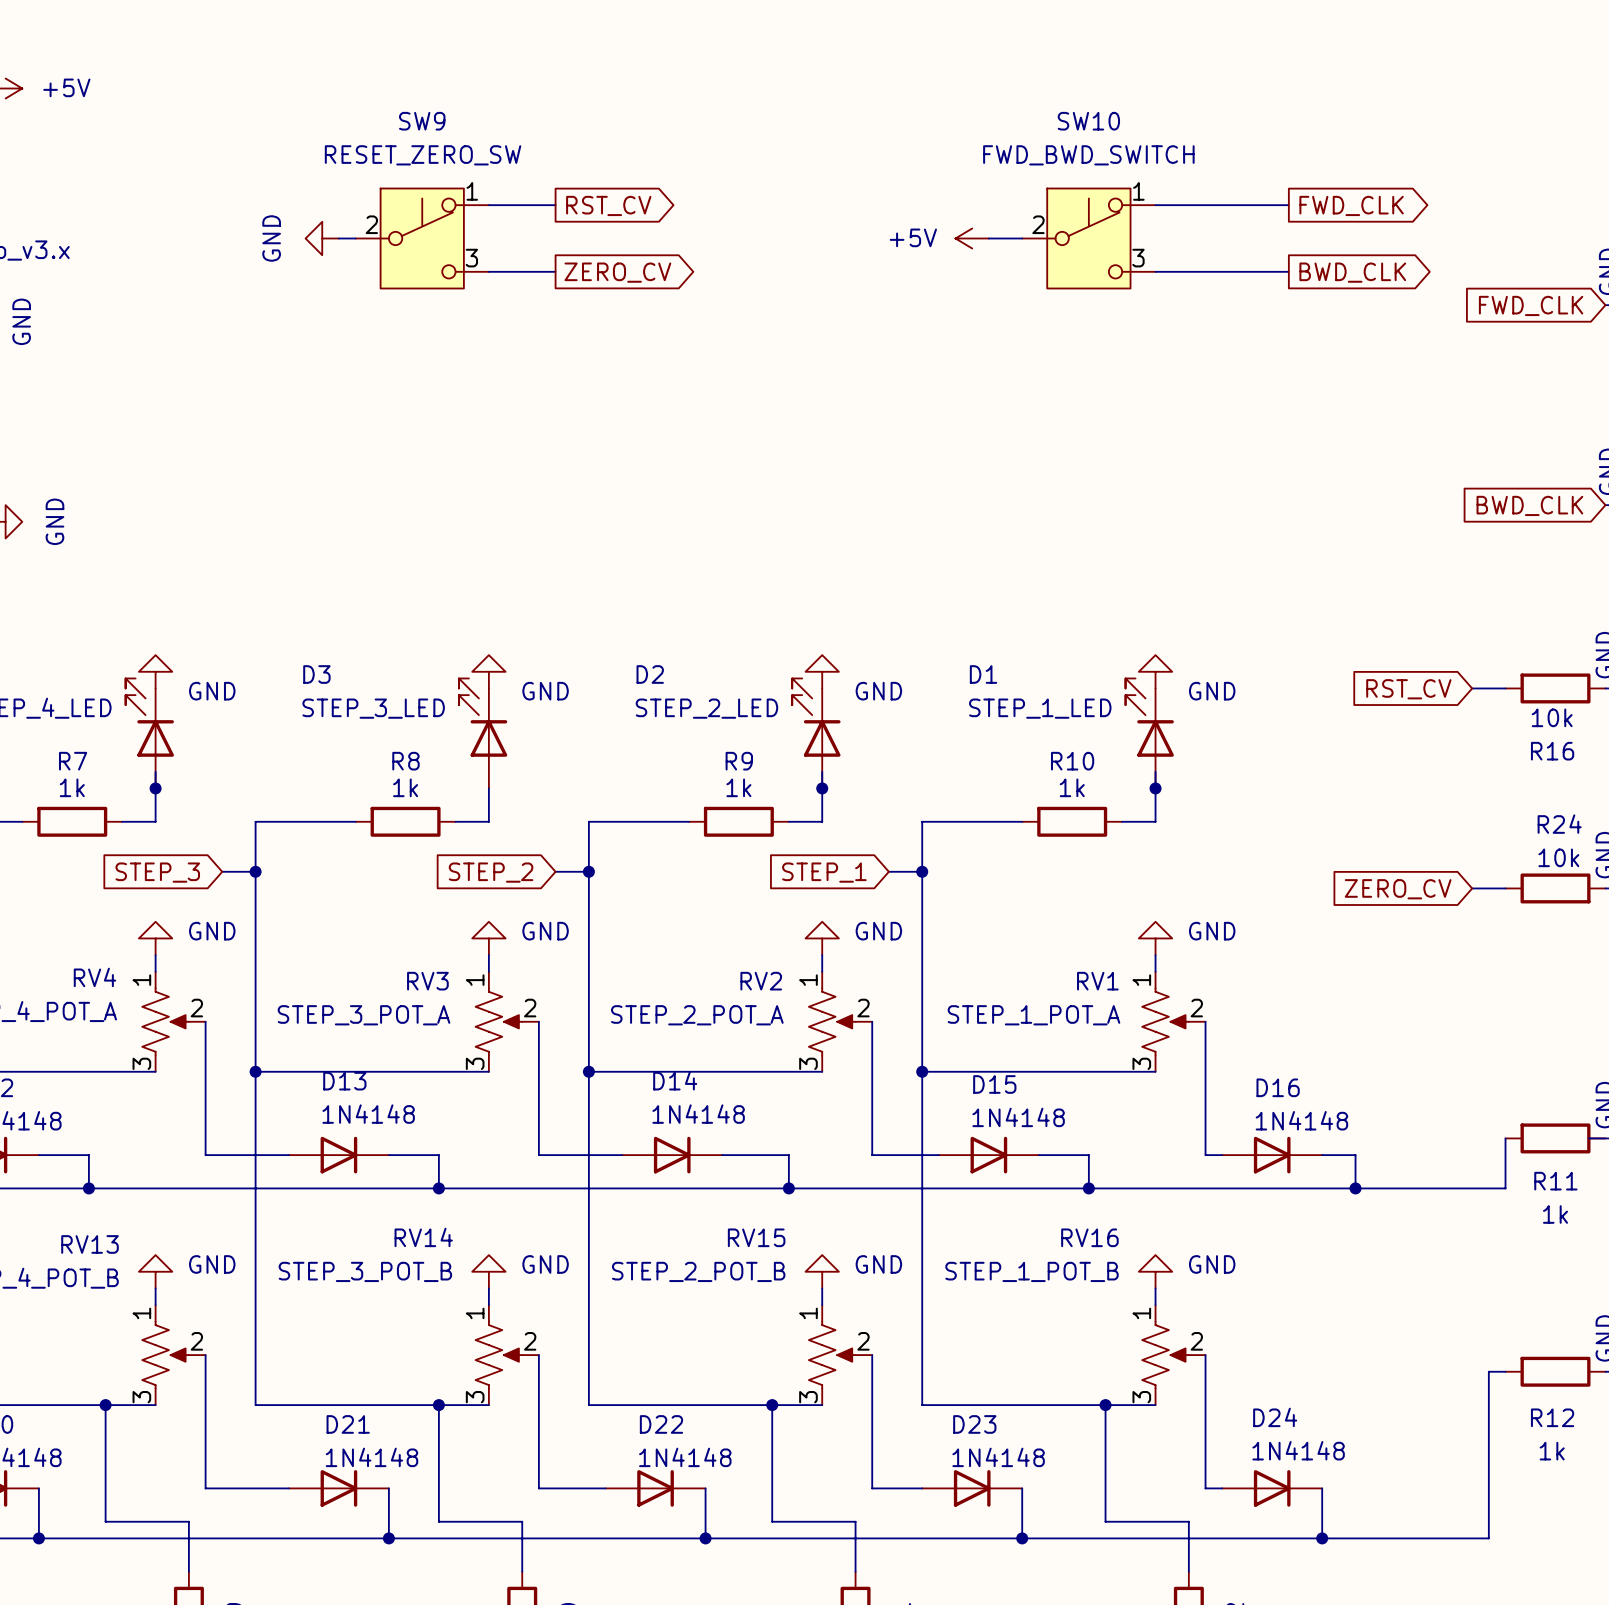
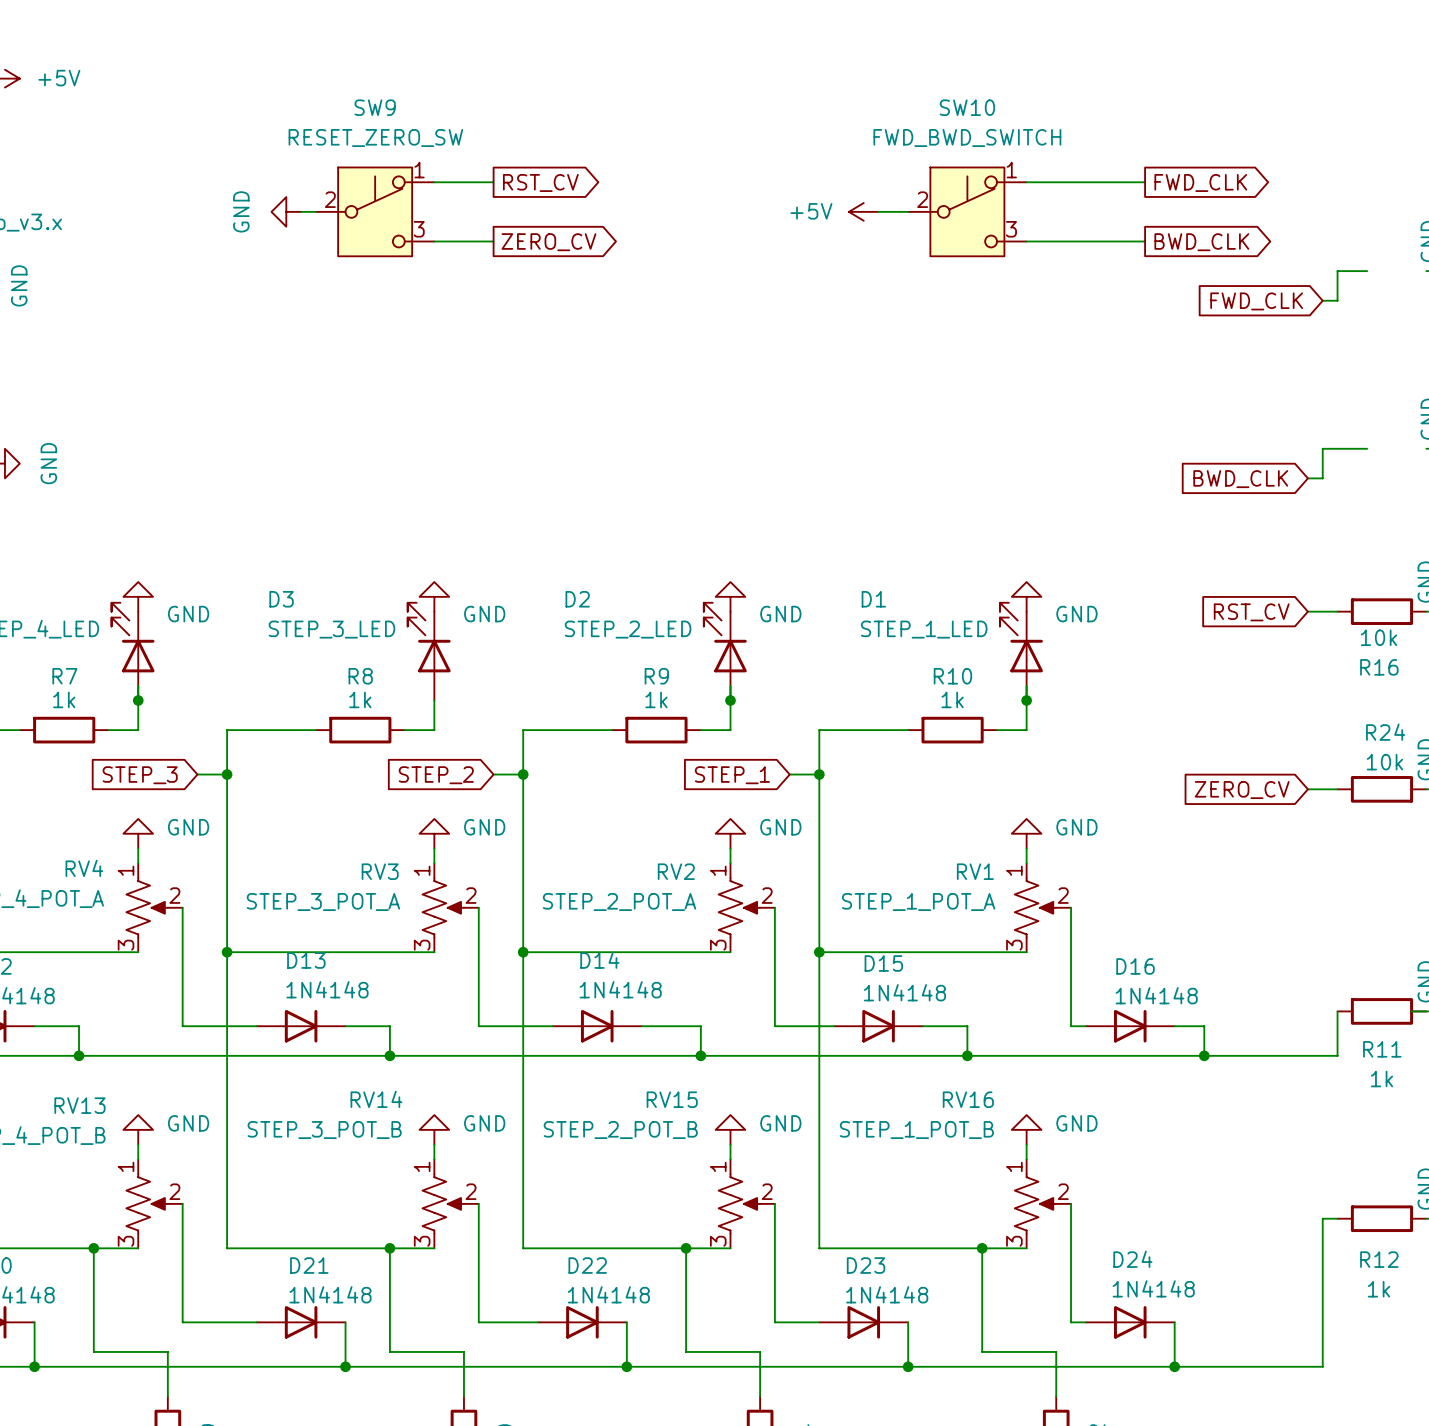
global label position: FWD_CLK (1531, 305) -> FWD_CLK (1256, 301)
wire: none -> (1367, 271) (1337, 271) (1337, 300) (1322, 300)
global label position: BWD_CLK (1529, 505) -> BWD_CLK (1240, 479)
wire: none -> (1367, 448) (1322, 448) (1322, 478) (1307, 478)

